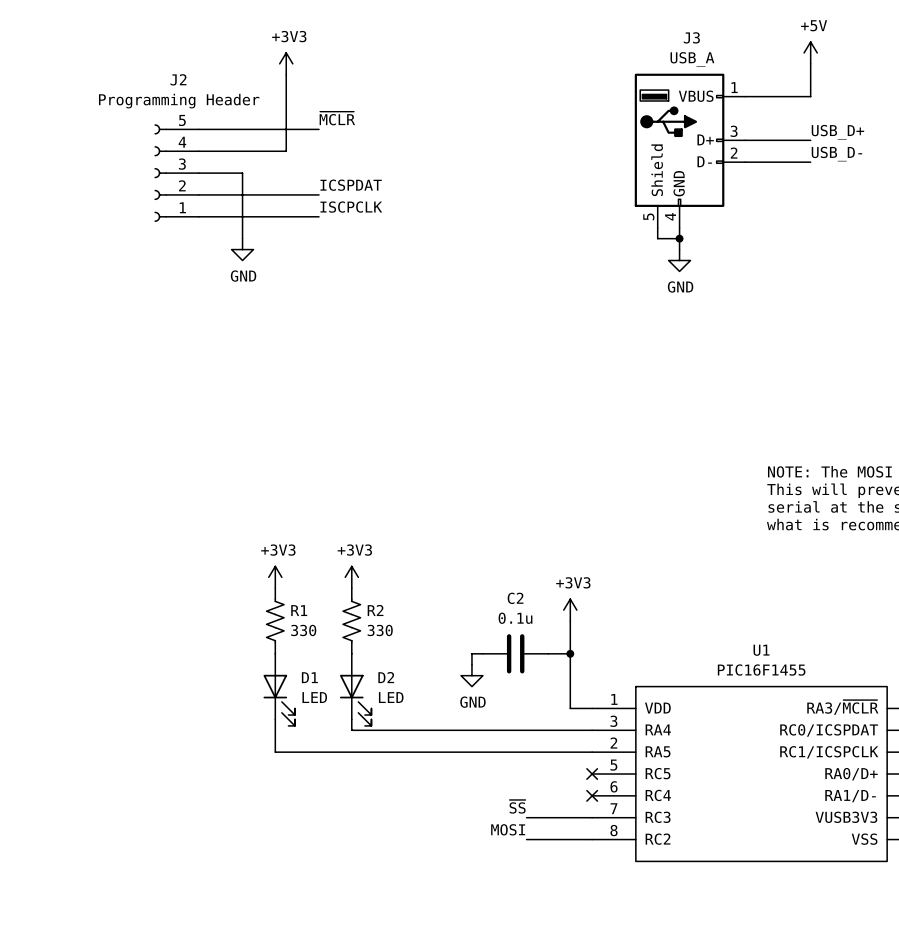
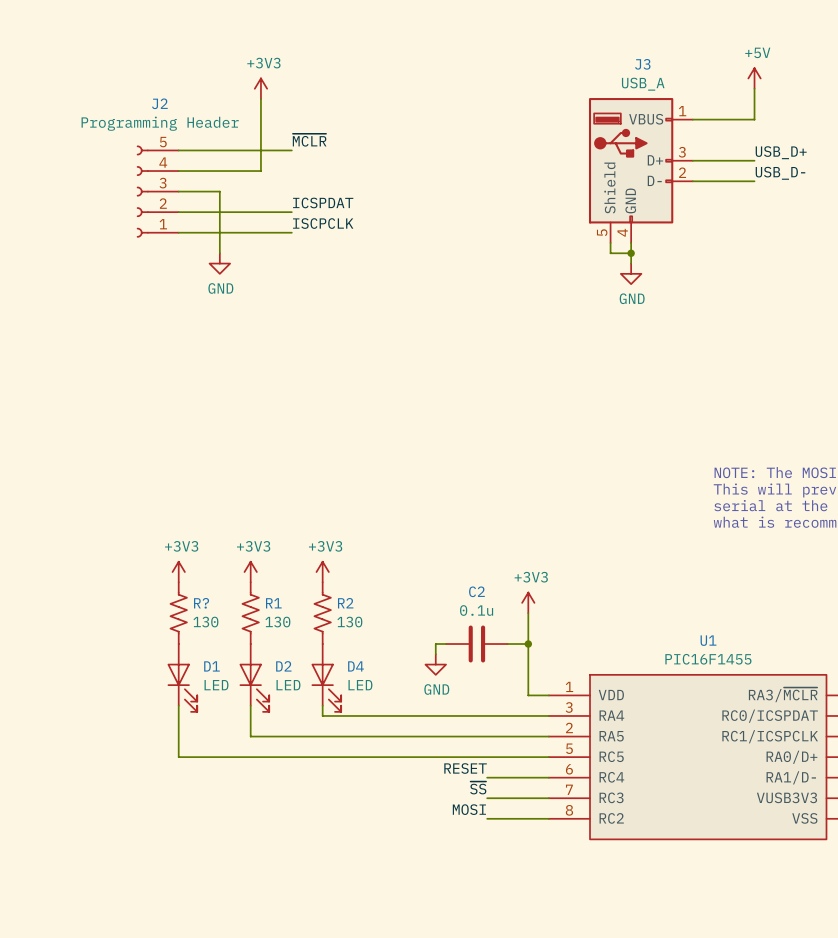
power symbol: none -> +3V3 (178, 572)
R?: none -> 130 (178, 613)
R1 value: 330 (303, 630) -> 130 (277, 622)
R2 value: 330 (380, 630) -> 130 (349, 622)
D1 name: D1 (309, 677) -> D2 (283, 666)
D2 name: D2 (386, 677) -> D4 (355, 666)
D1: none -> LED (182, 677)
wire: none -> (178, 705) (178, 757) (548, 757)
no-connect mark: (592, 774) -> none
label: none -> RESET (465, 768)
wire: none -> (487, 777) (548, 777)
no-connect mark: (592, 795) -> none

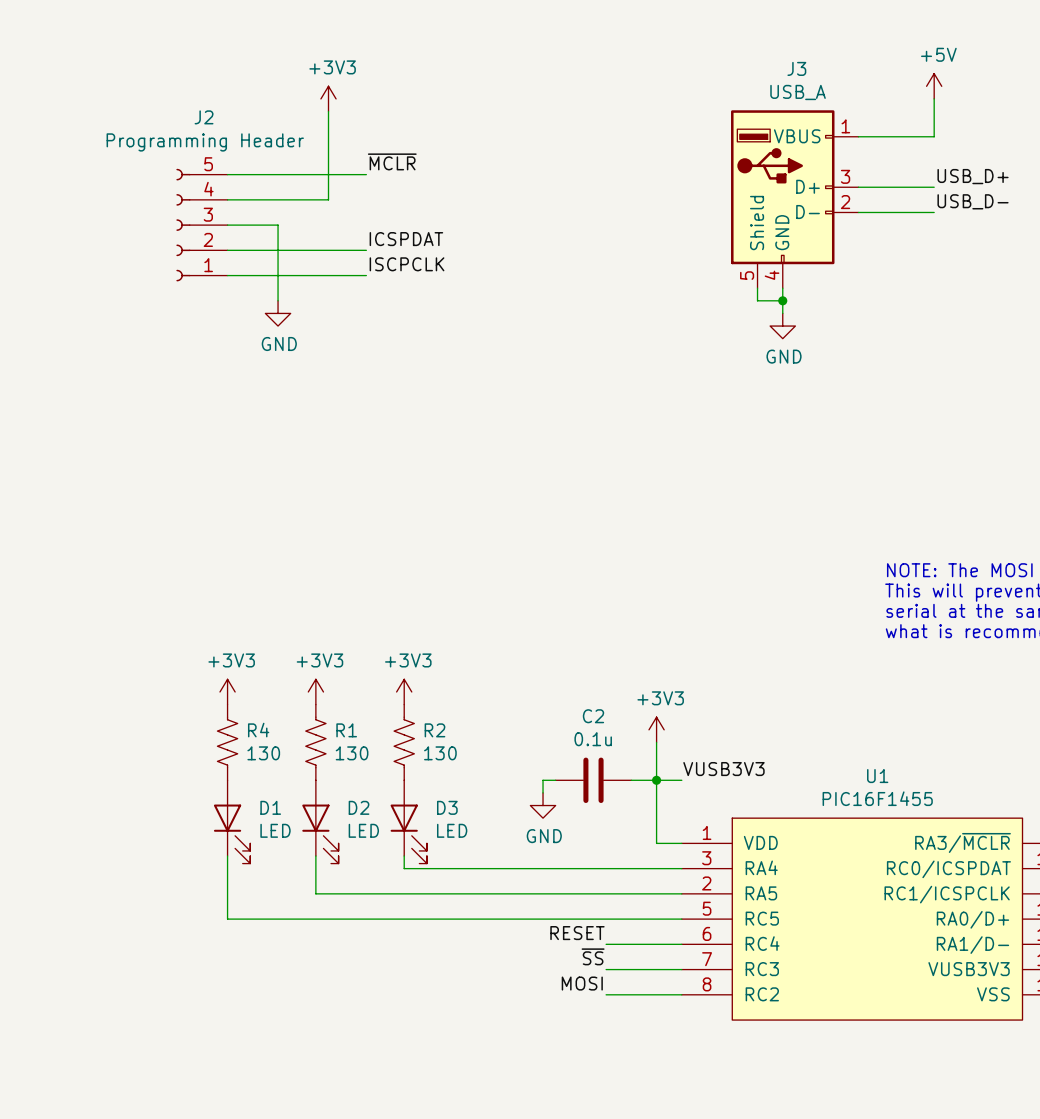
R? name: R? (201, 603) -> R4 (258, 730)
label: none -> VUSB3V3 (723, 769)
wire: none -> (656, 780) (681, 780)
D4 name: D4 (355, 666) -> D3 (447, 807)

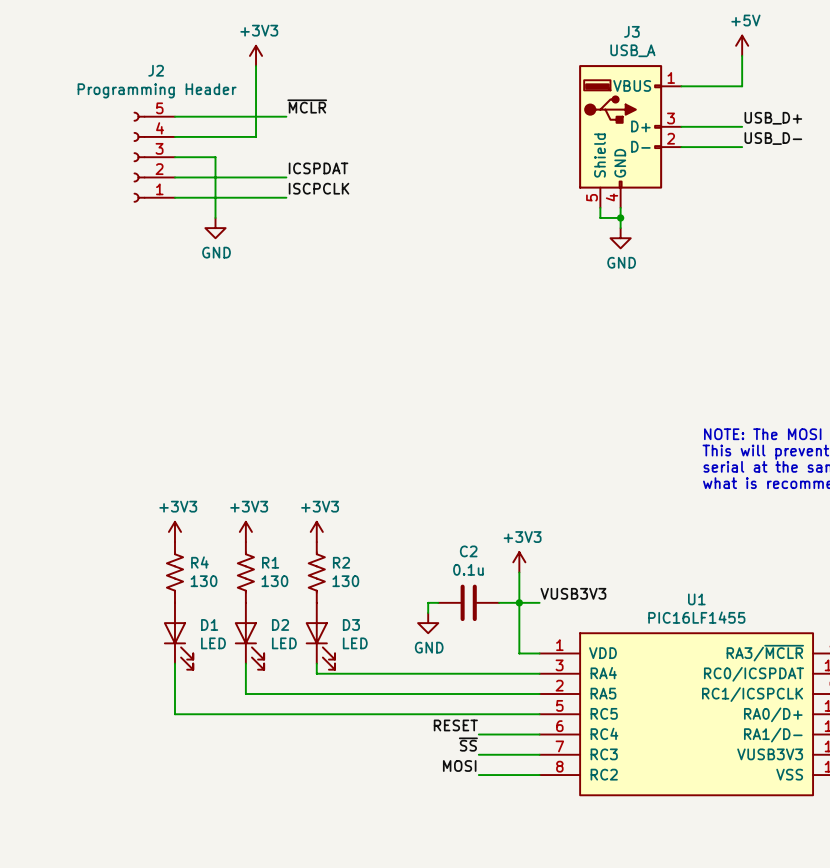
U1 value: PIC16F1455 (877, 798) -> PIC16LF1455 (696, 617)

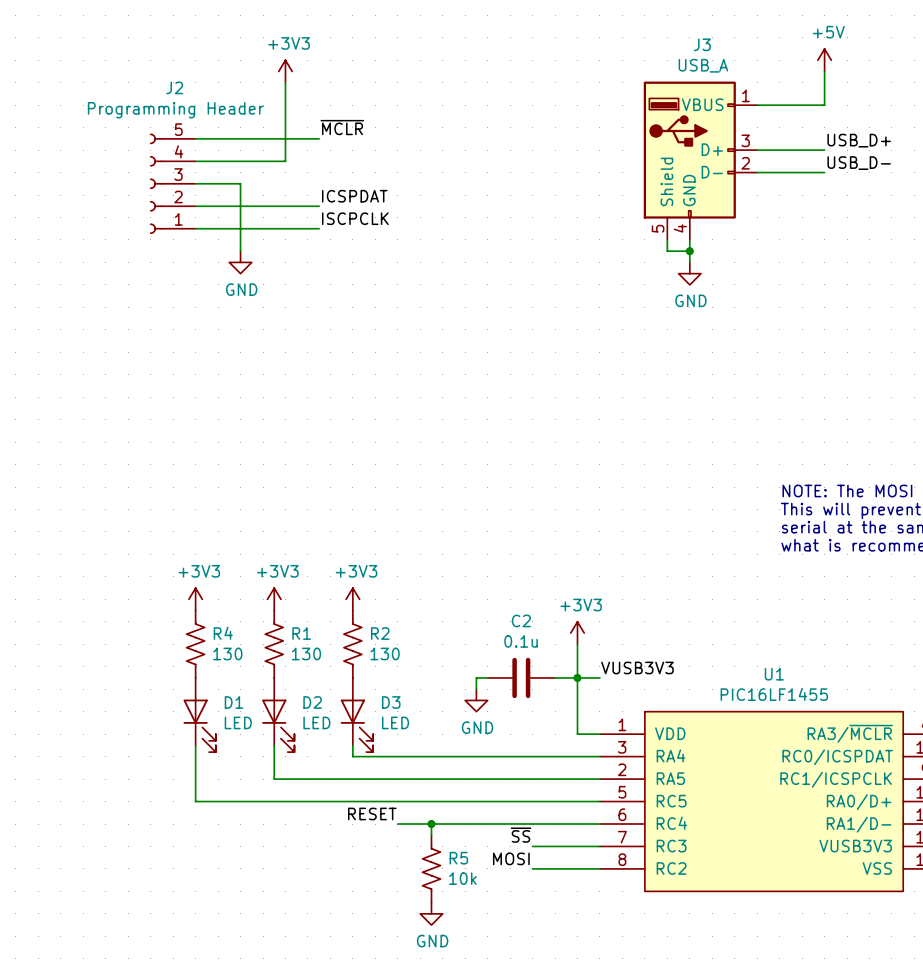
label position: RESET (455, 725) -> RESET (372, 813)
wire: none -> (397, 824) (532, 824)
wire: none -> (431, 824) (431, 835)
junction: none -> (431, 824)
R5: none -> 10k (431, 868)
power symbol: none -> GND (431, 913)

